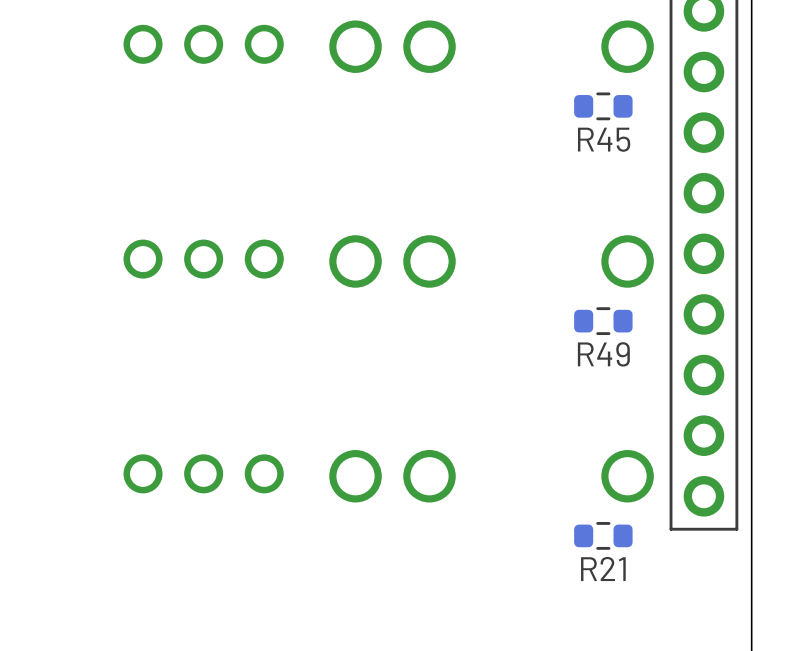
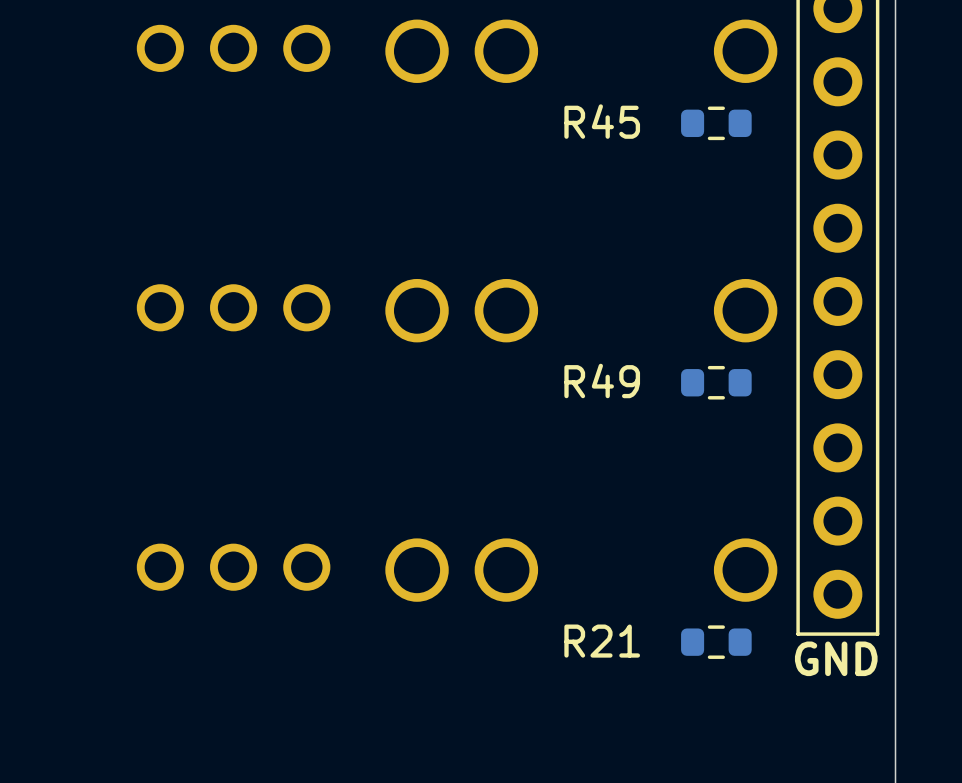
R45 name position: R45 (604, 139) -> R45 (602, 121)
R49 name position: R49 (603, 354) -> R49 (602, 380)
text: none -> GND (836, 658)
R21 name position: R21 (603, 569) -> R21 (602, 641)

